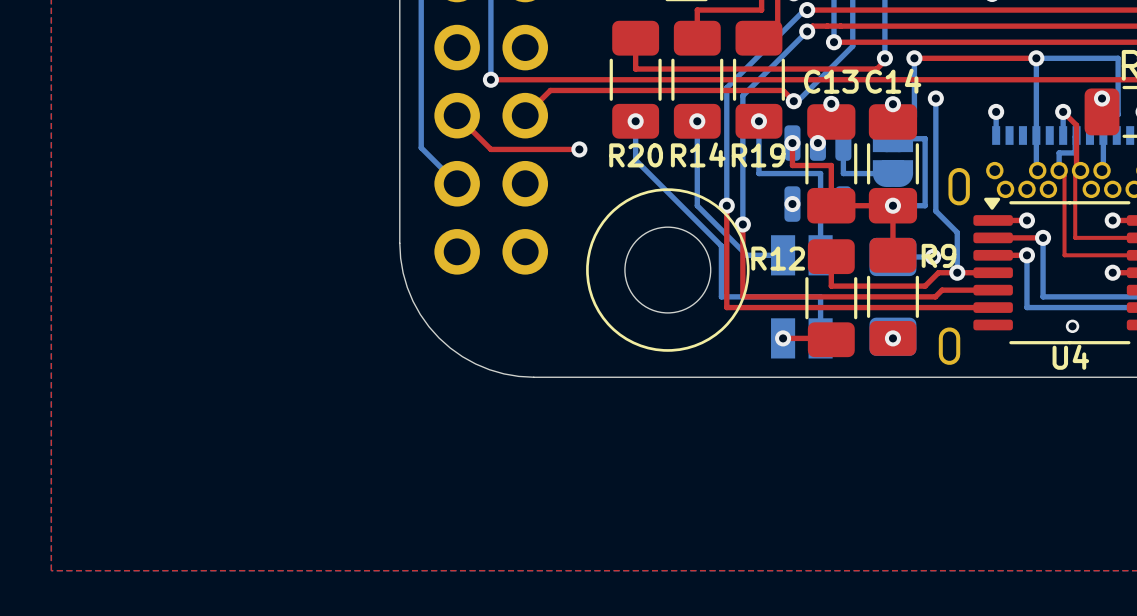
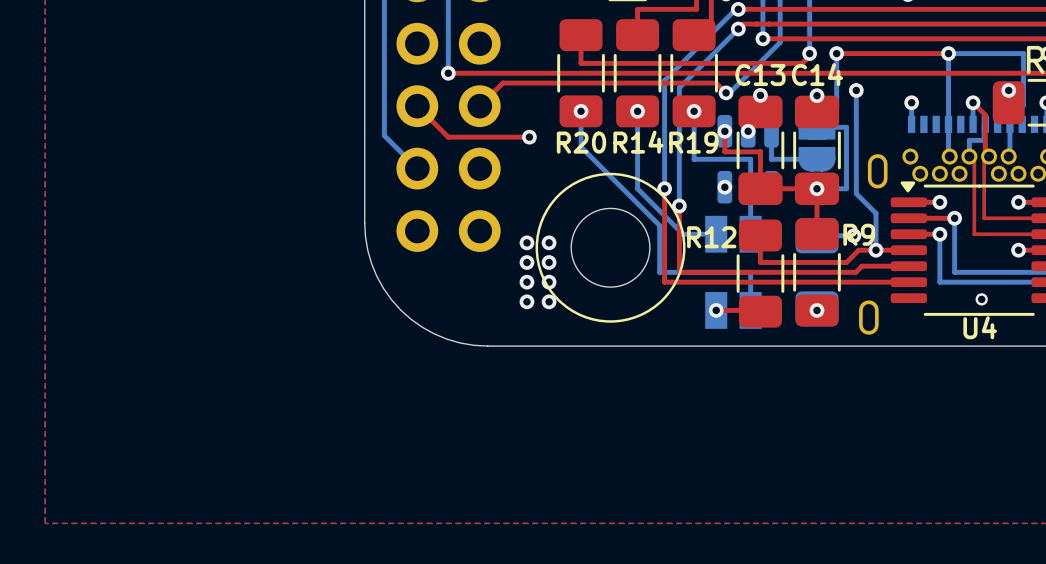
via: none -> (526, 242)
via: none -> (549, 242)
via: none -> (526, 262)
via: none -> (549, 262)
via: none -> (526, 282)
via: none -> (549, 282)
via: none -> (526, 301)
via: none -> (549, 301)

